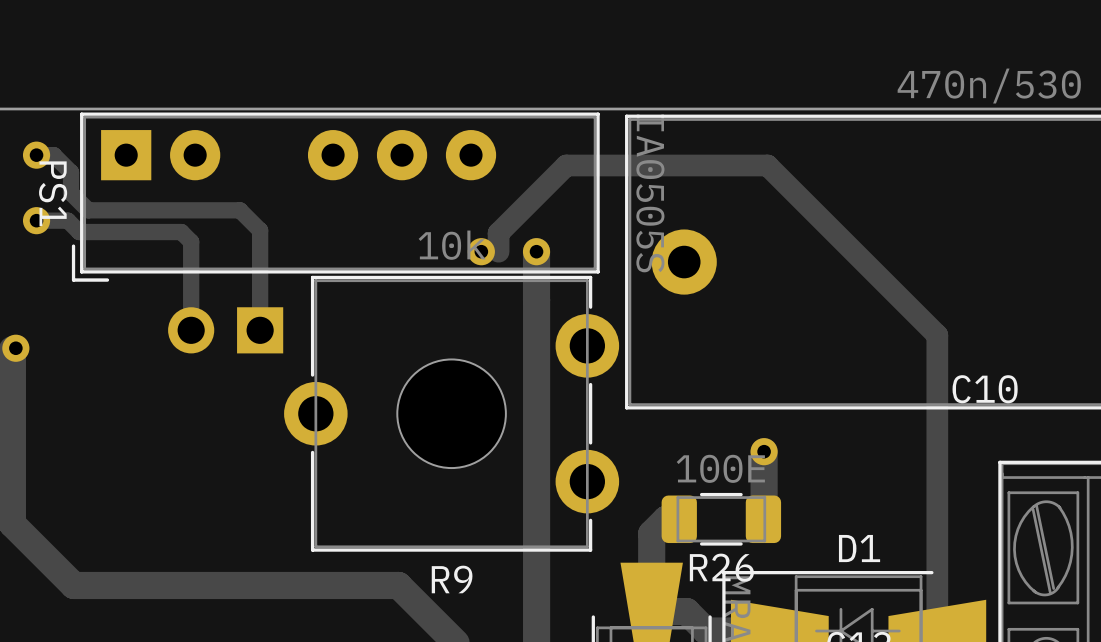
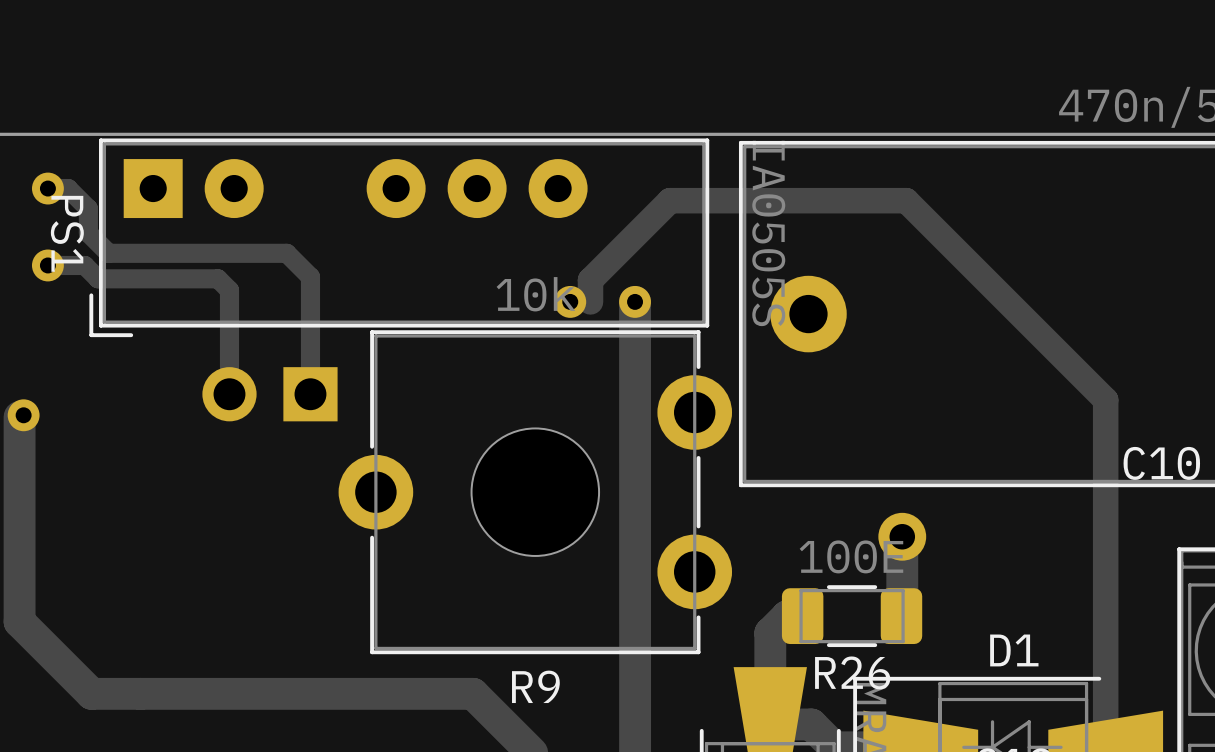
part footprint: [750, 438, 778, 466] -> [878, 512, 927, 561]

